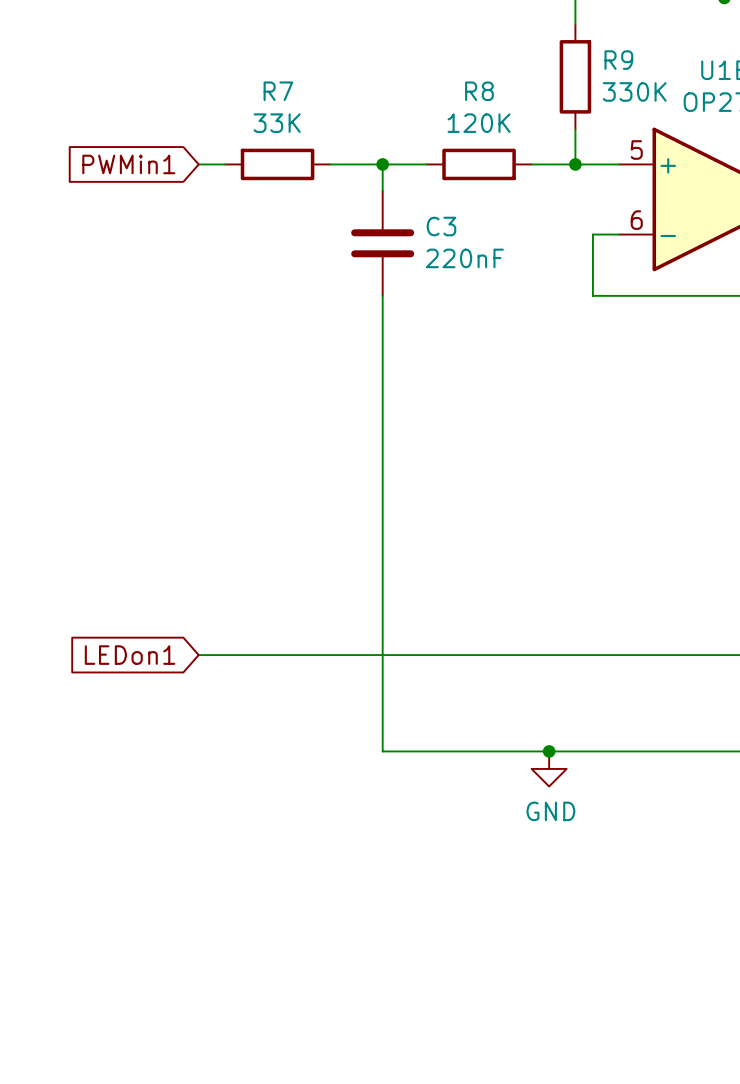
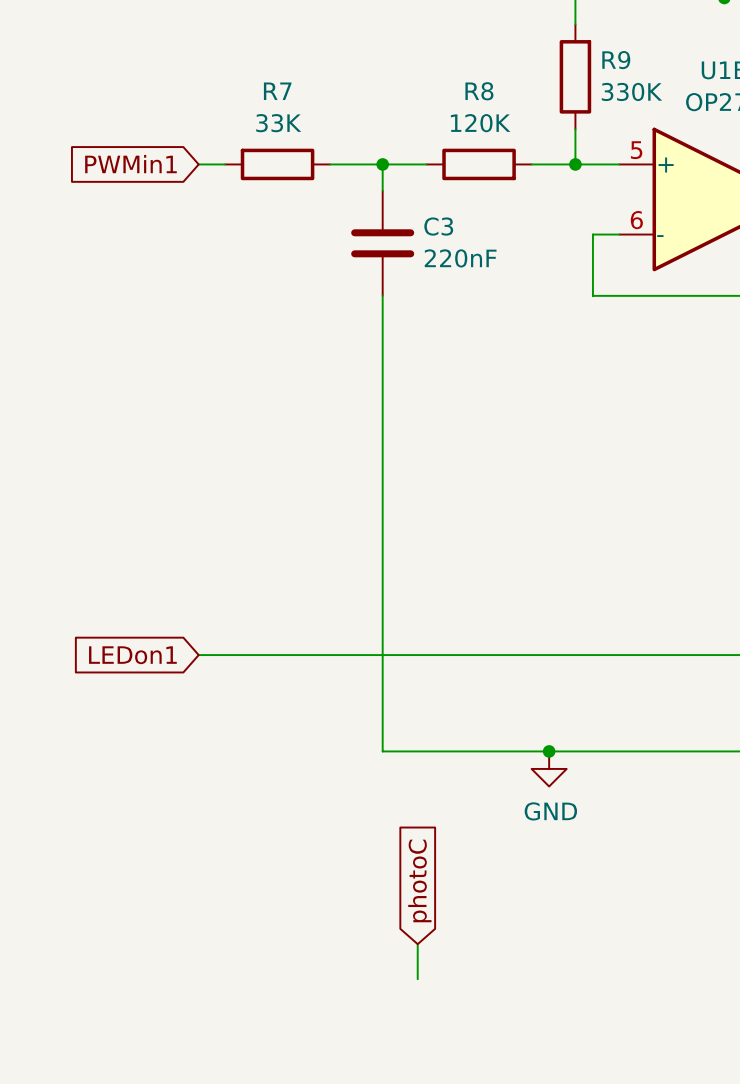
global label: none -> photoC (419, 880)
wire: none -> (417, 944) (417, 979)

